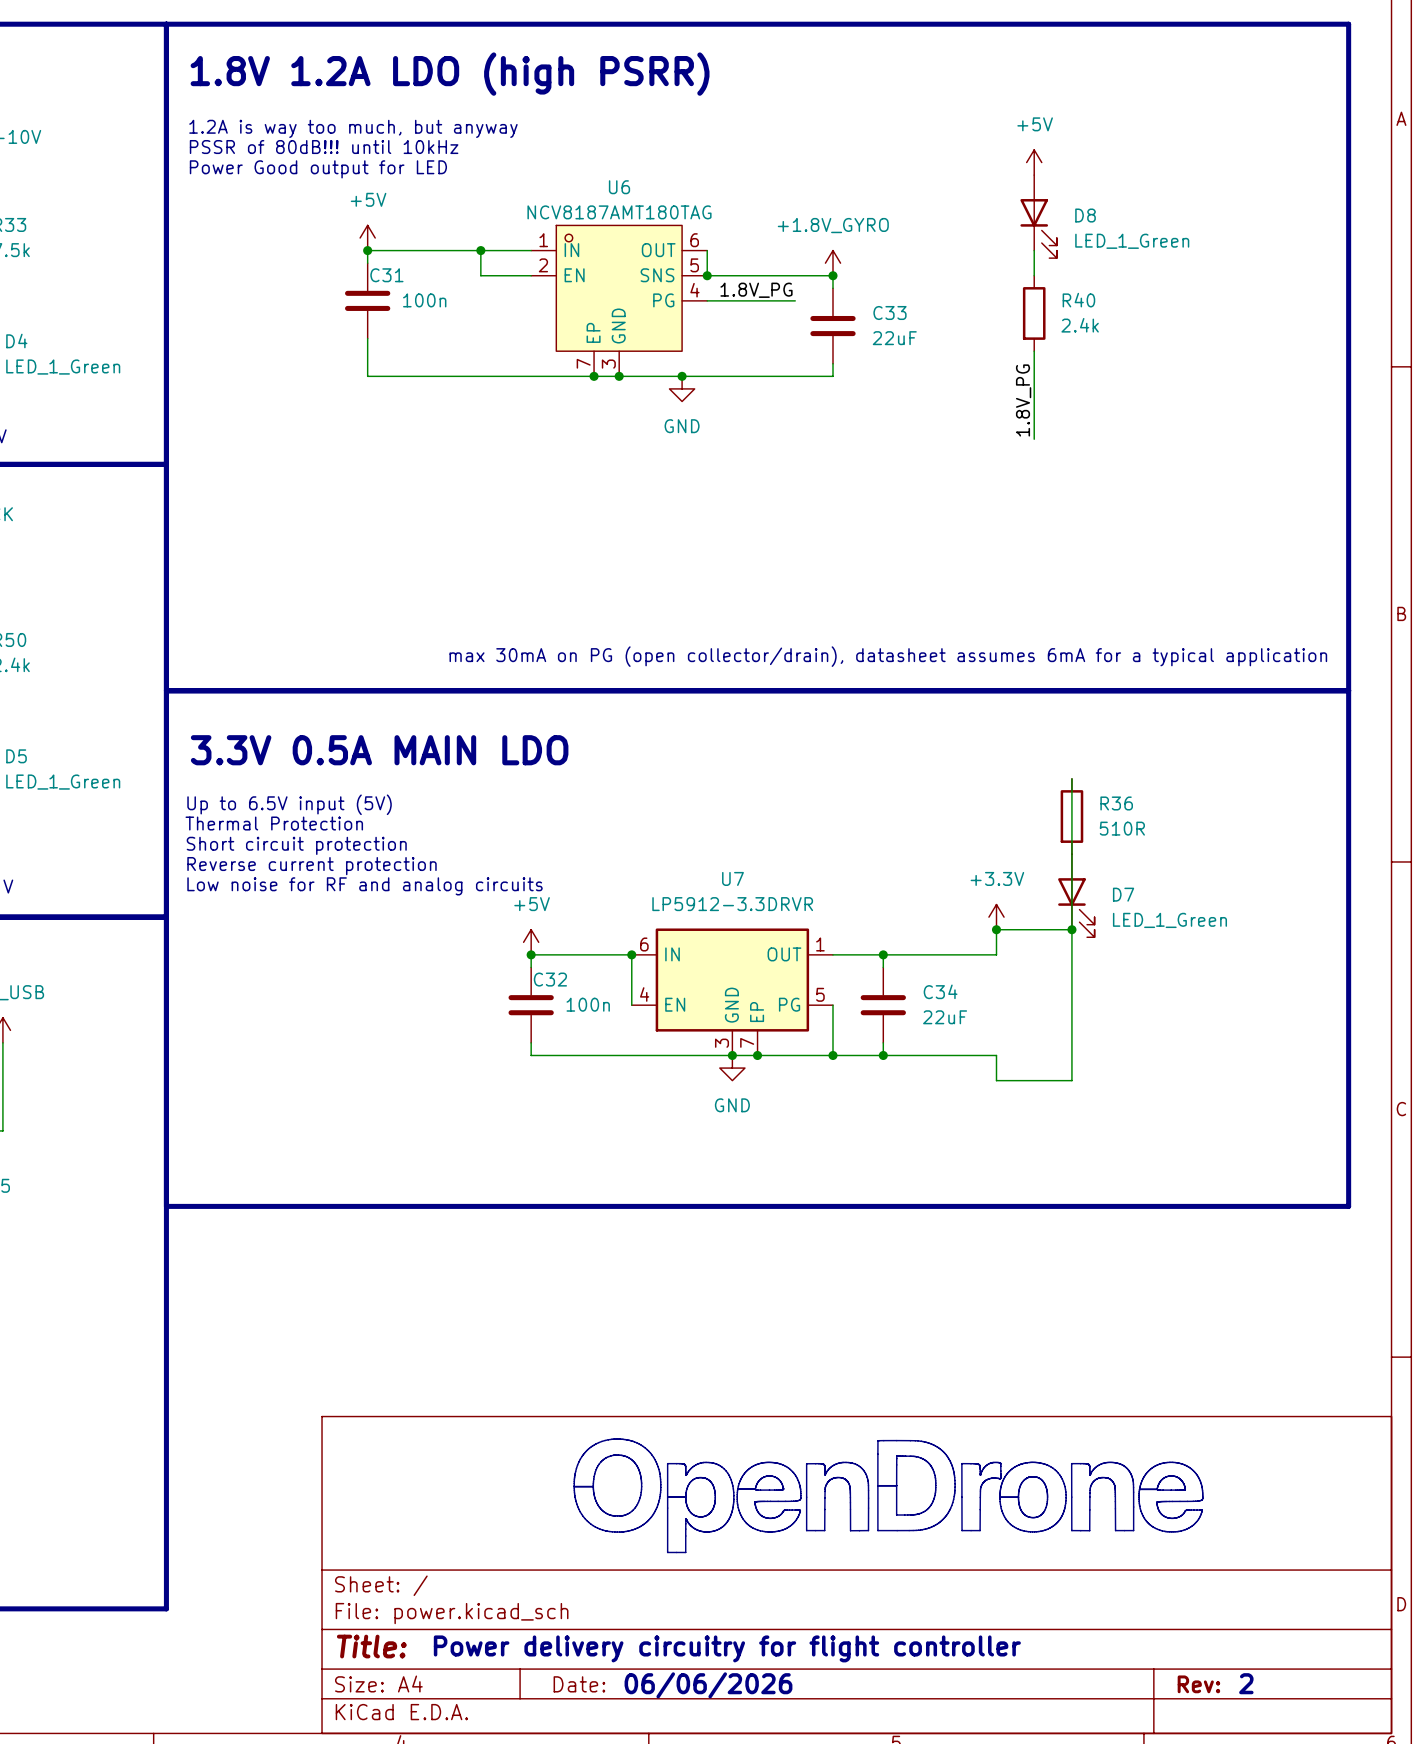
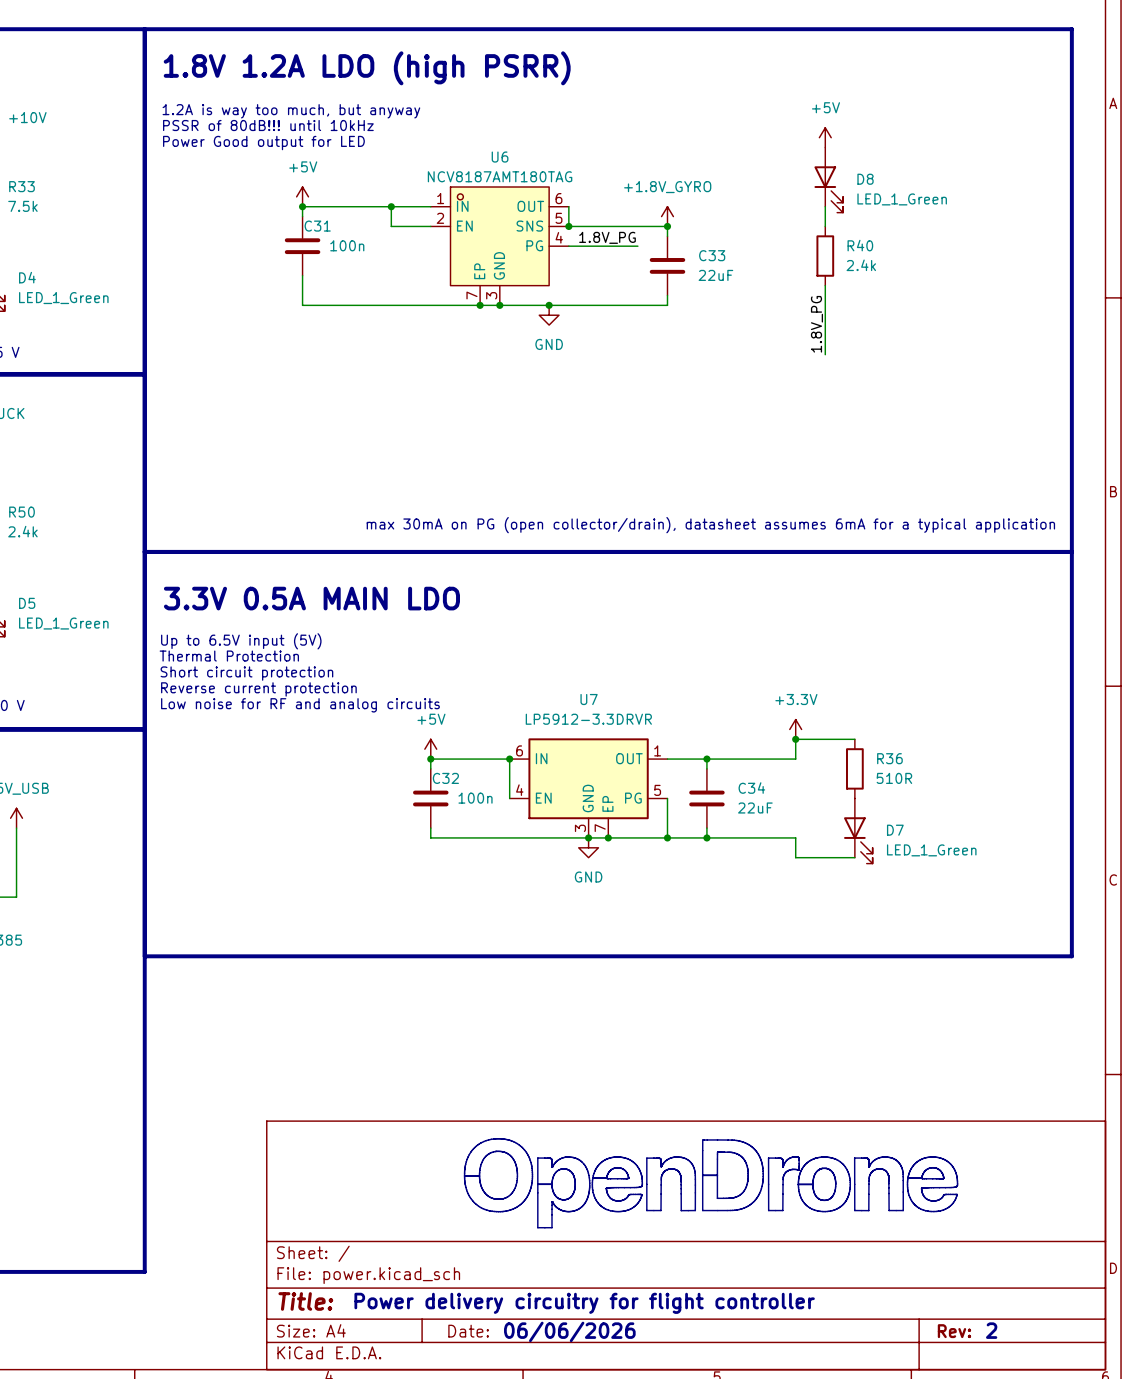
wire: (1071, 778) (1071, 1080) -> none
R36 position: (1071, 816) -> (854, 768)
D7 position: (1076, 895) -> (858, 831)
junction: (1071, 929) -> none

